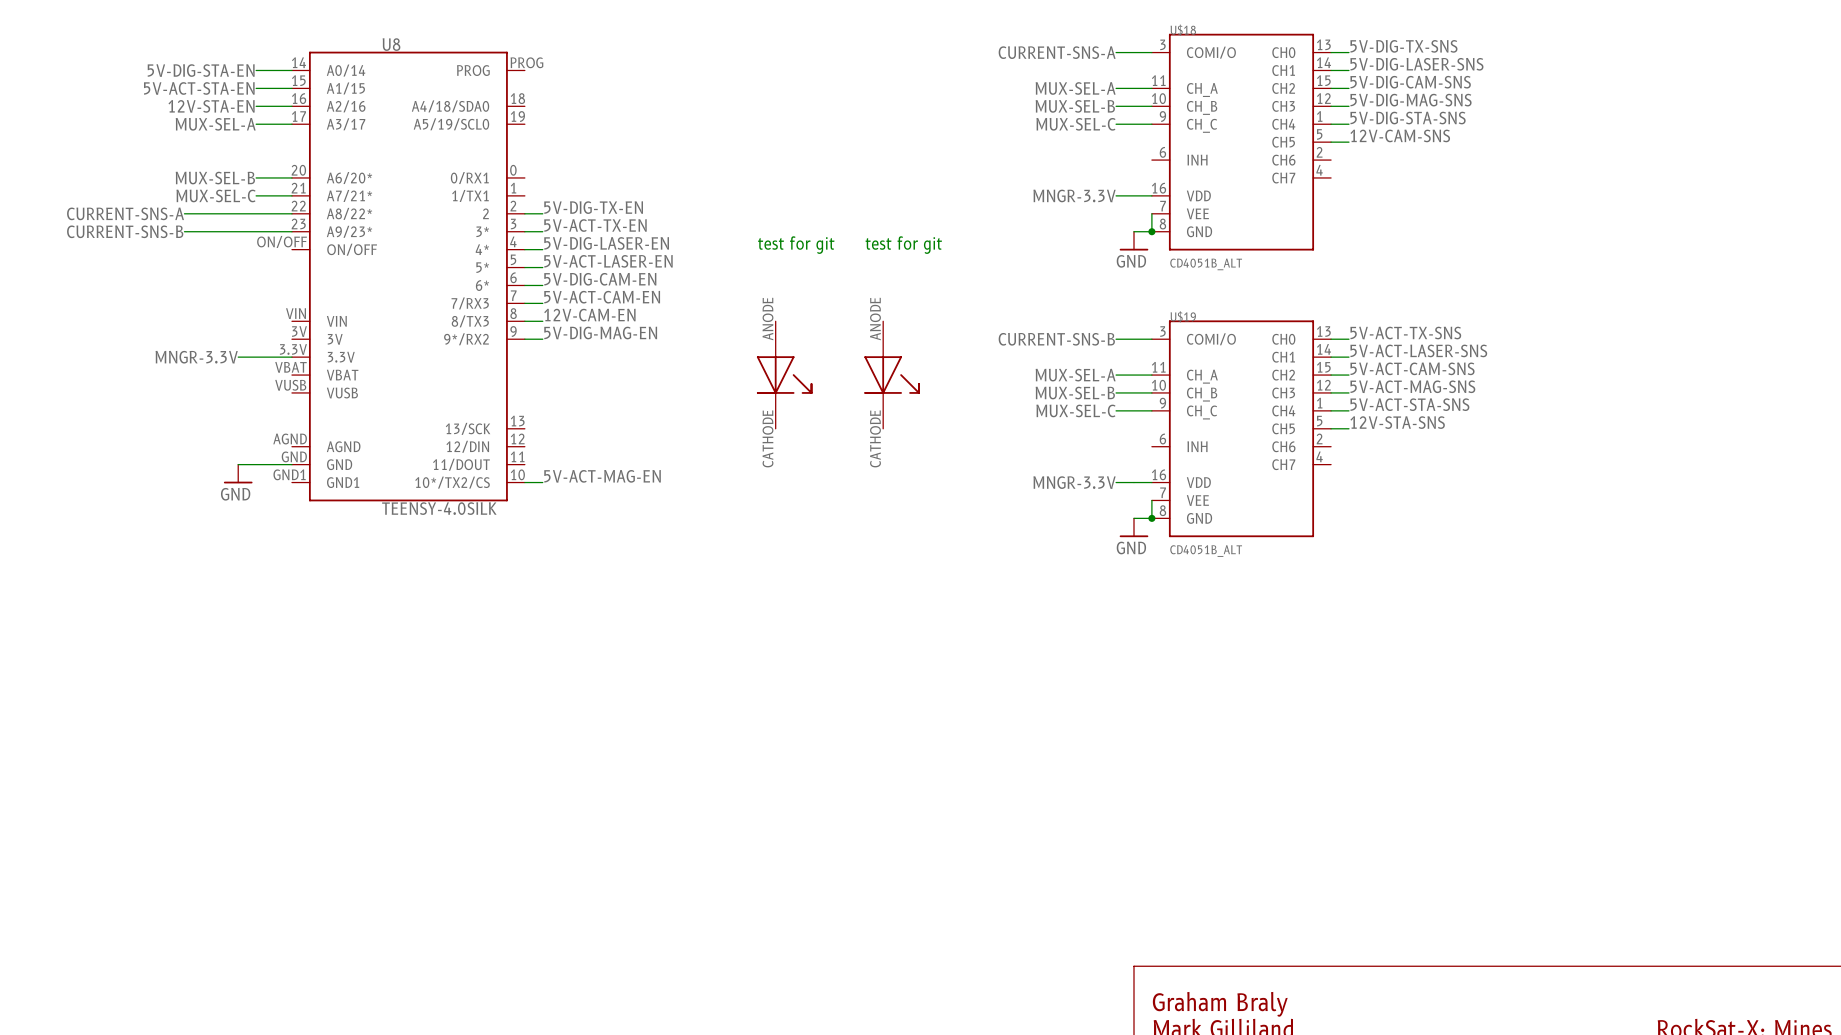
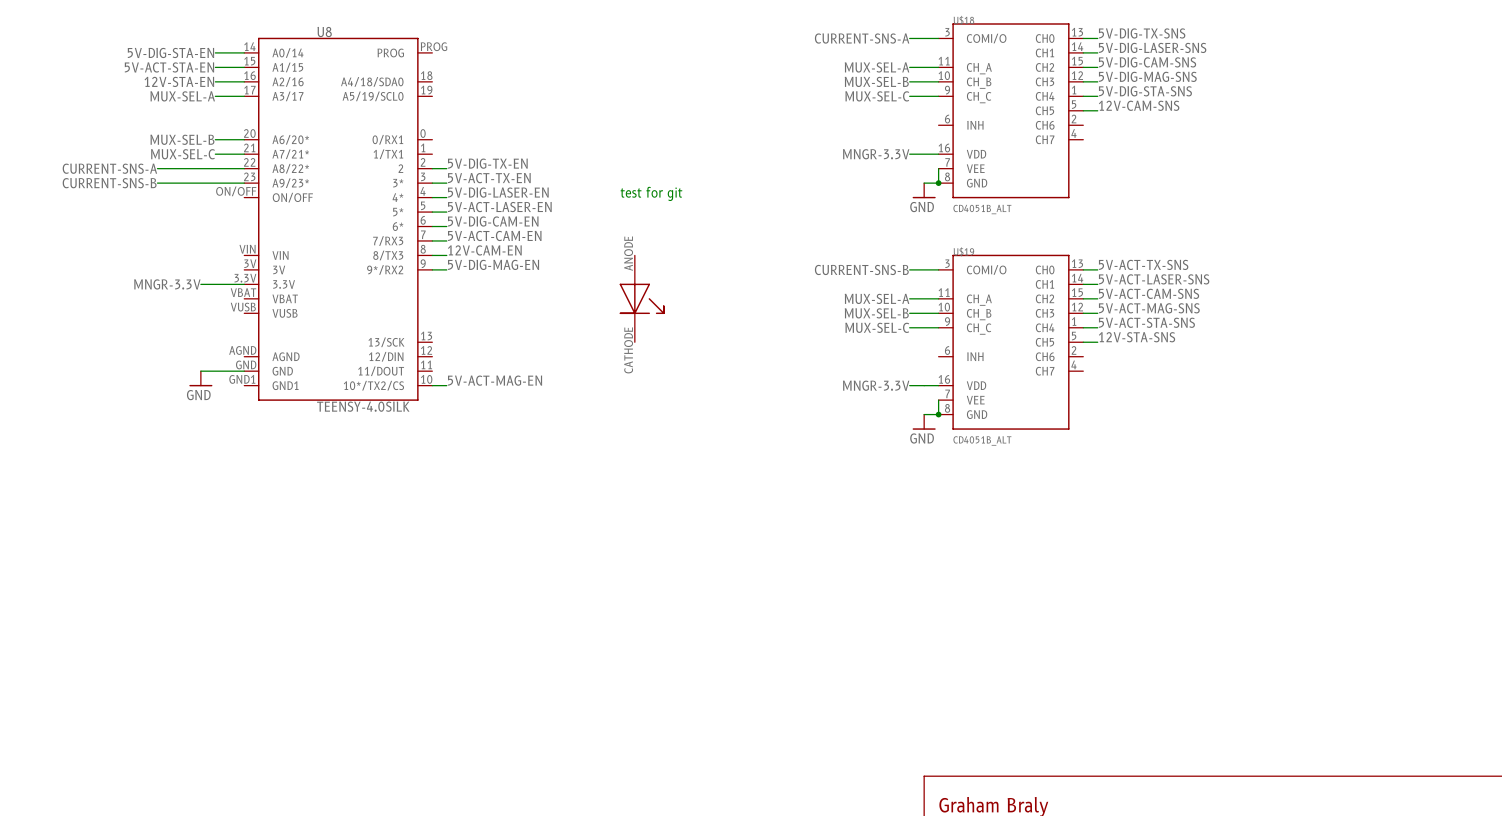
text: test for git (903, 245) -> none
part: (892, 375) -> none

